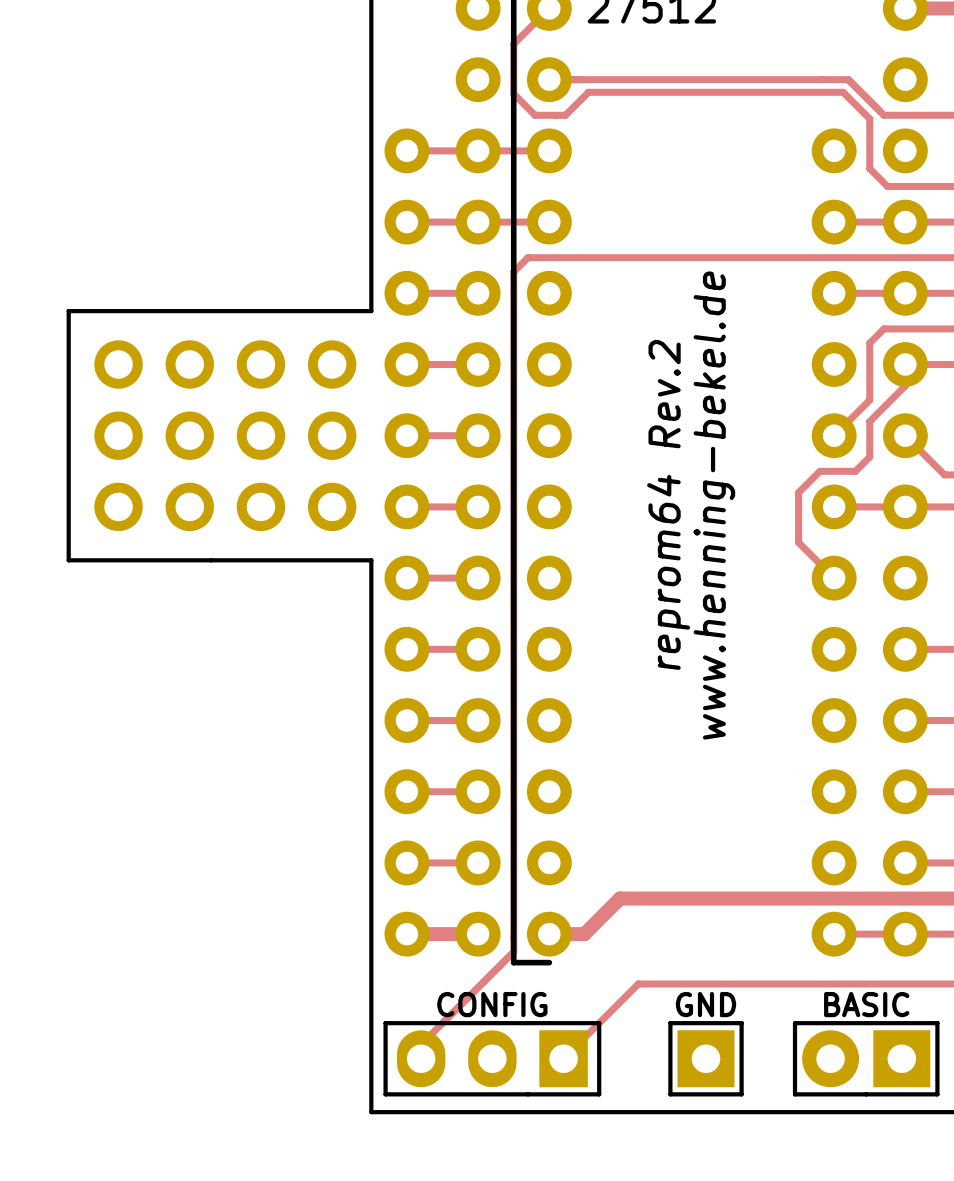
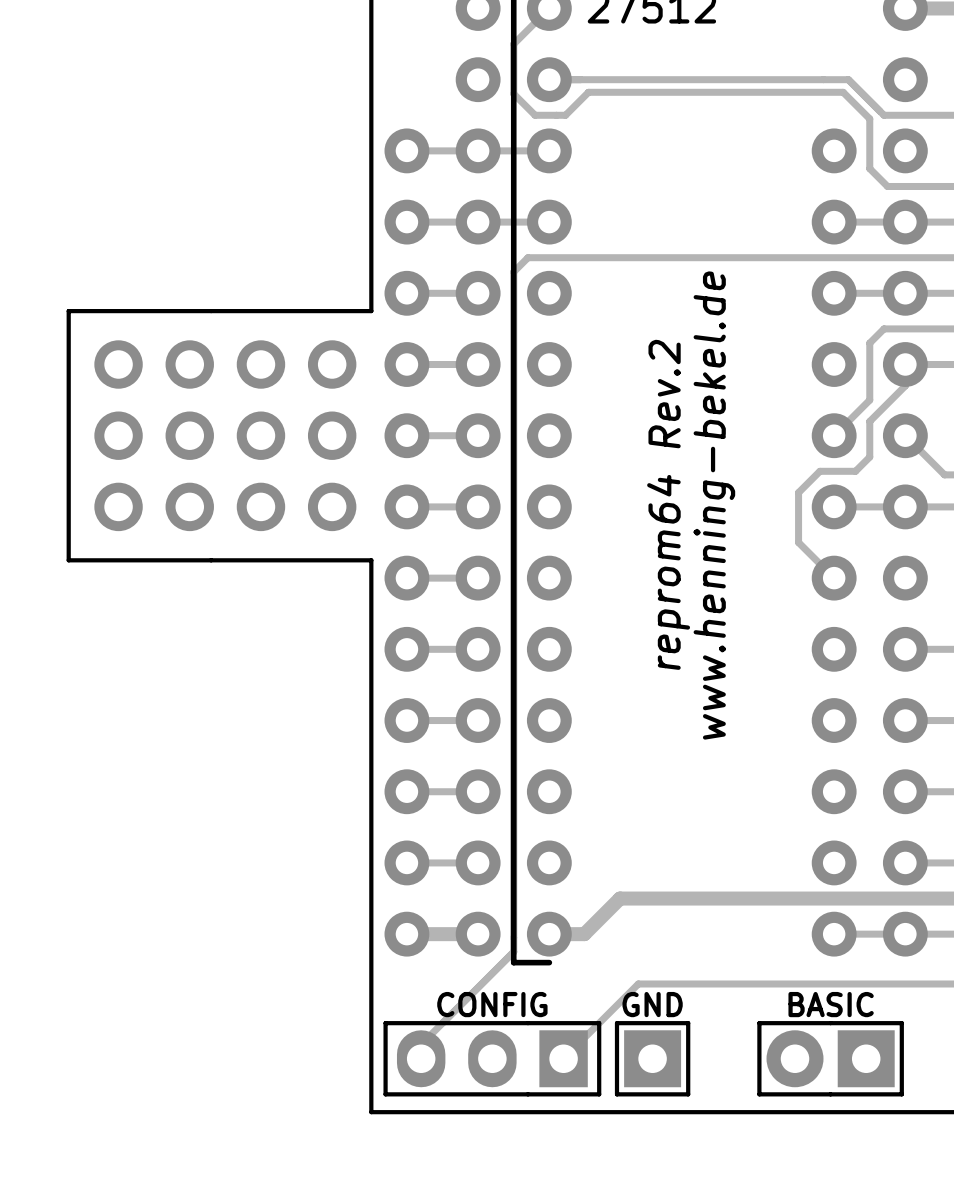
text position: GND (706, 1004) -> GND (652, 1004)
text position: BASIC (866, 1004) -> BASIC (831, 1004)
part position: (706, 1058) -> (652, 1058)
part position: (866, 1058) -> (830, 1058)

